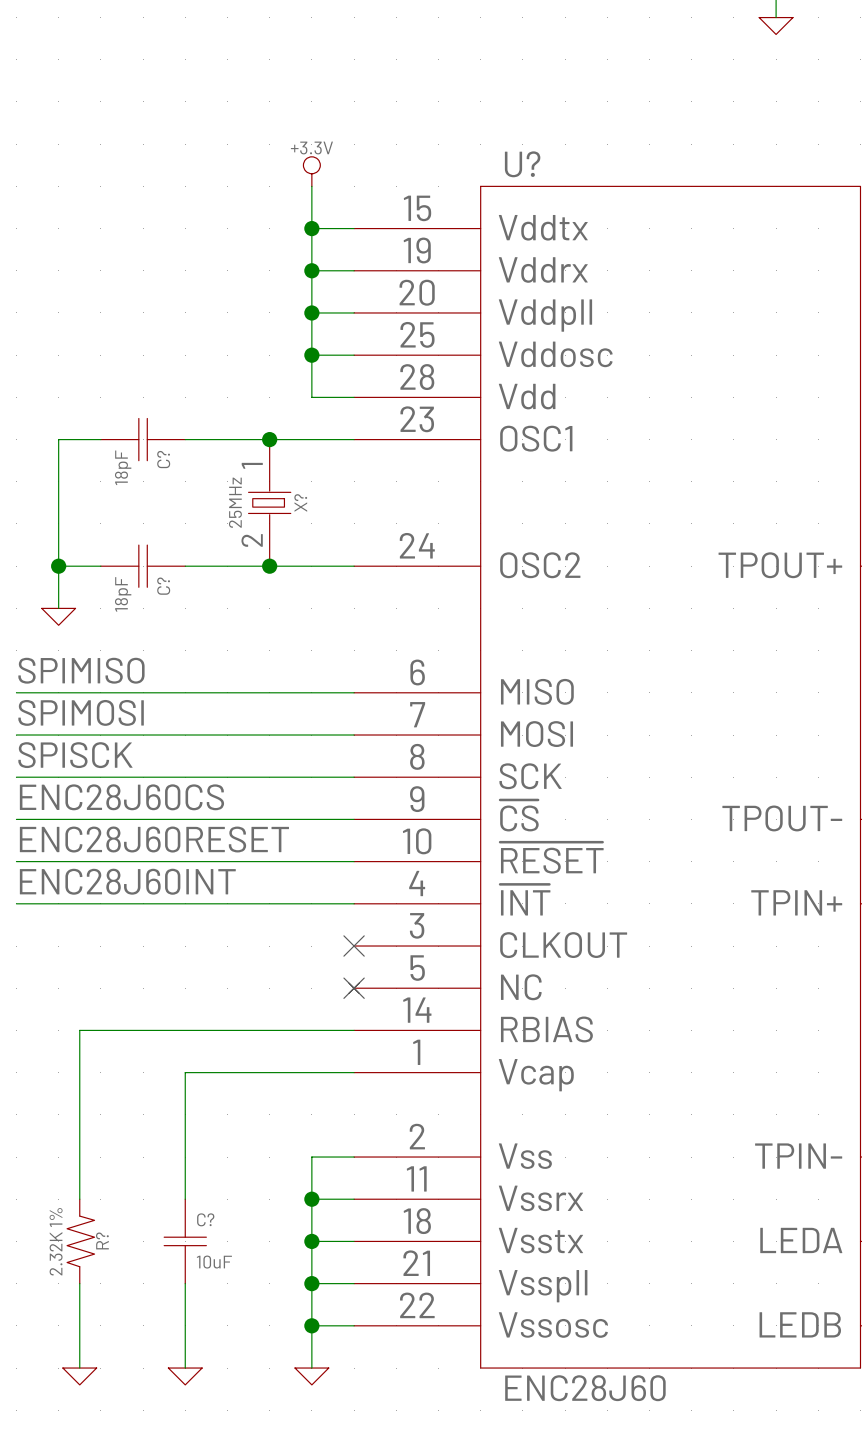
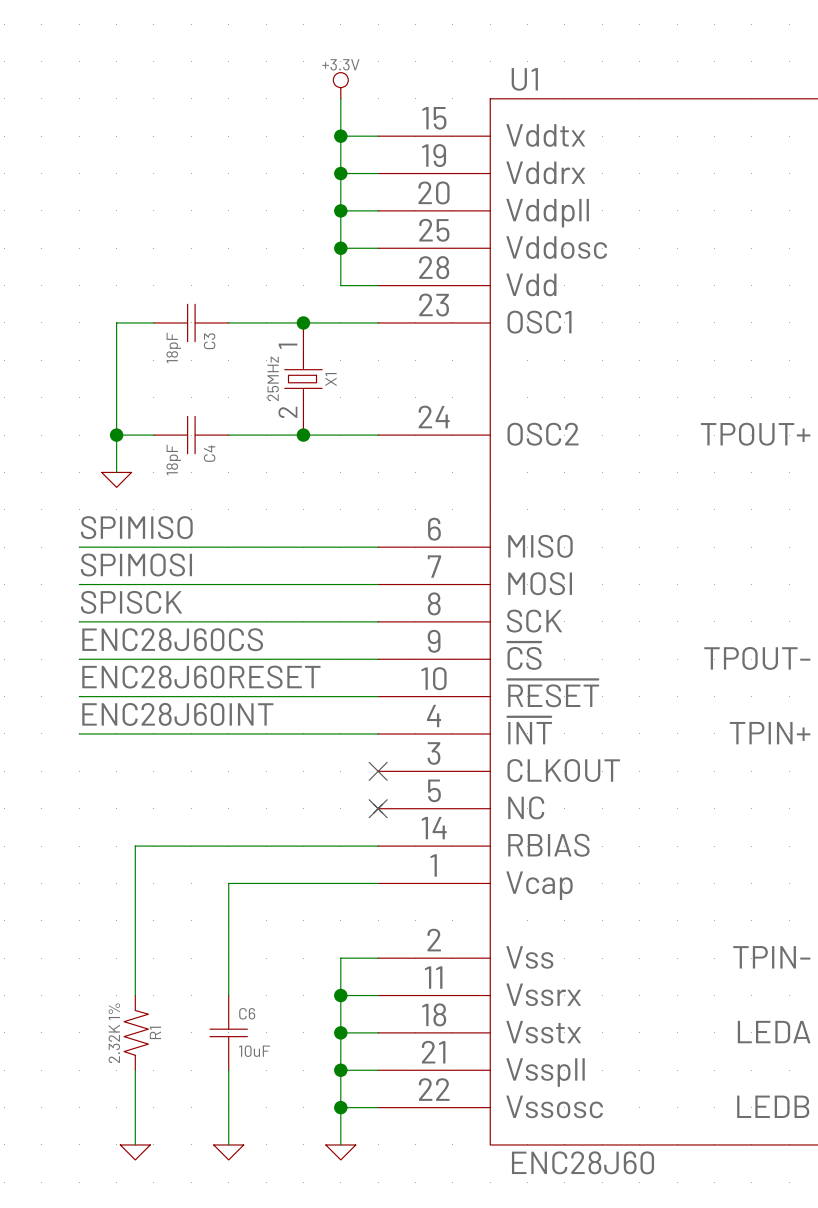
U? name: U? (522, 164) -> U1 (524, 79)
C? name: C? (163, 459) -> C3 (209, 341)
X? name: X? (300, 502) -> X1 (331, 379)
C? name: C? (163, 586) -> C4 (209, 453)
C? name: C? (205, 1219) -> C6 (247, 1013)
R? name: R? (102, 1240) -> R1 (155, 1032)

